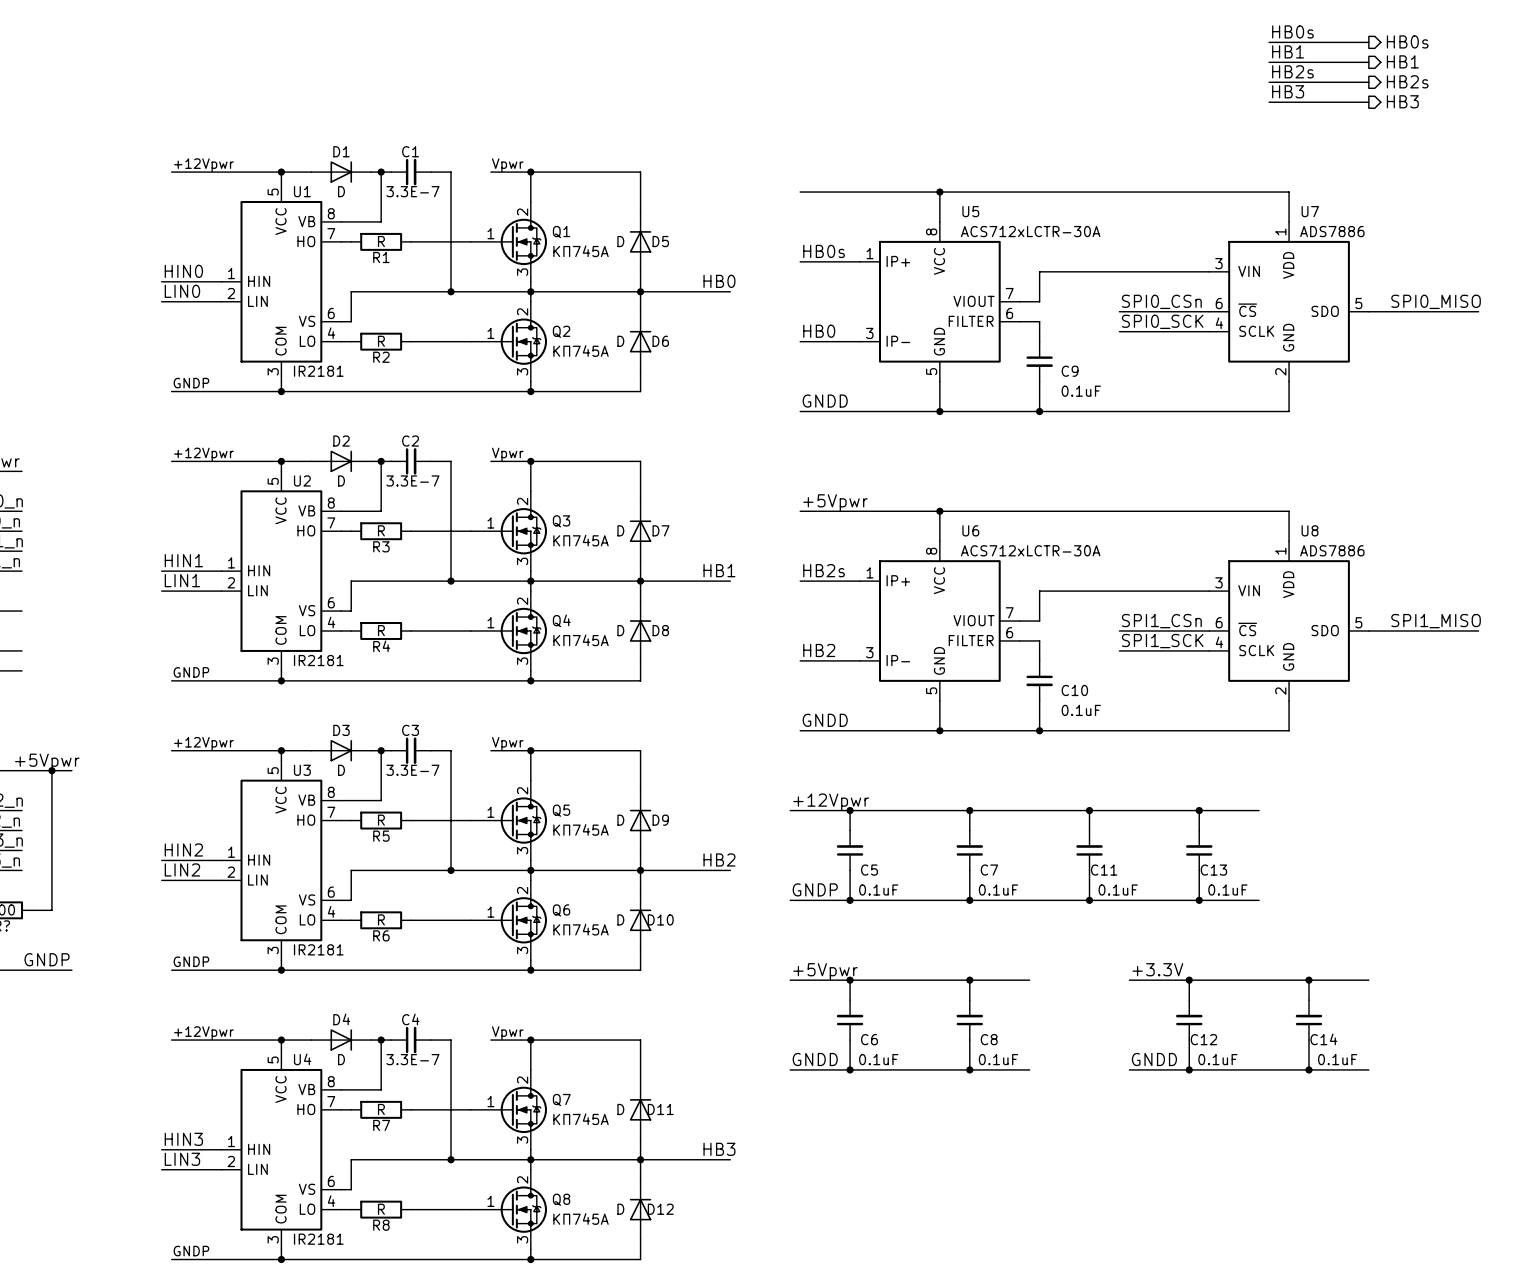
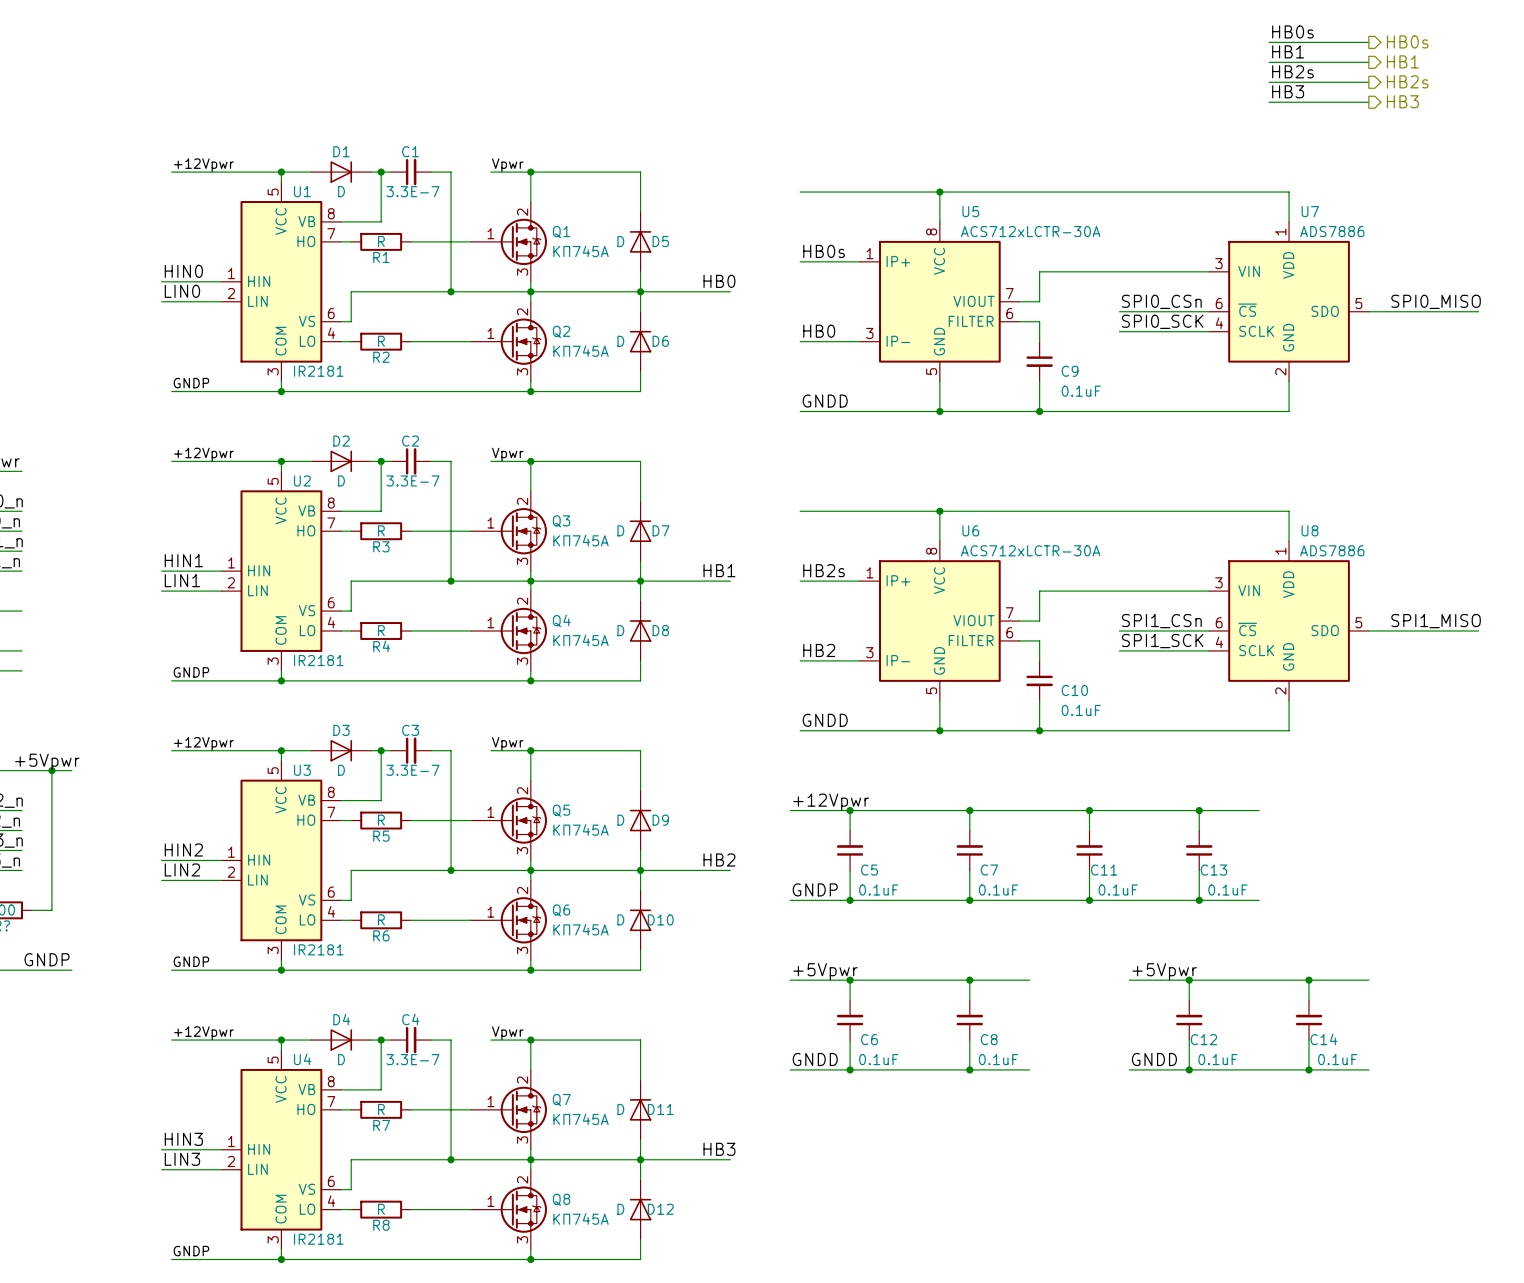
label: +5Vpwr (835, 502) -> none
label: +3.3V (1157, 969) -> +5Vpwr (1164, 971)

